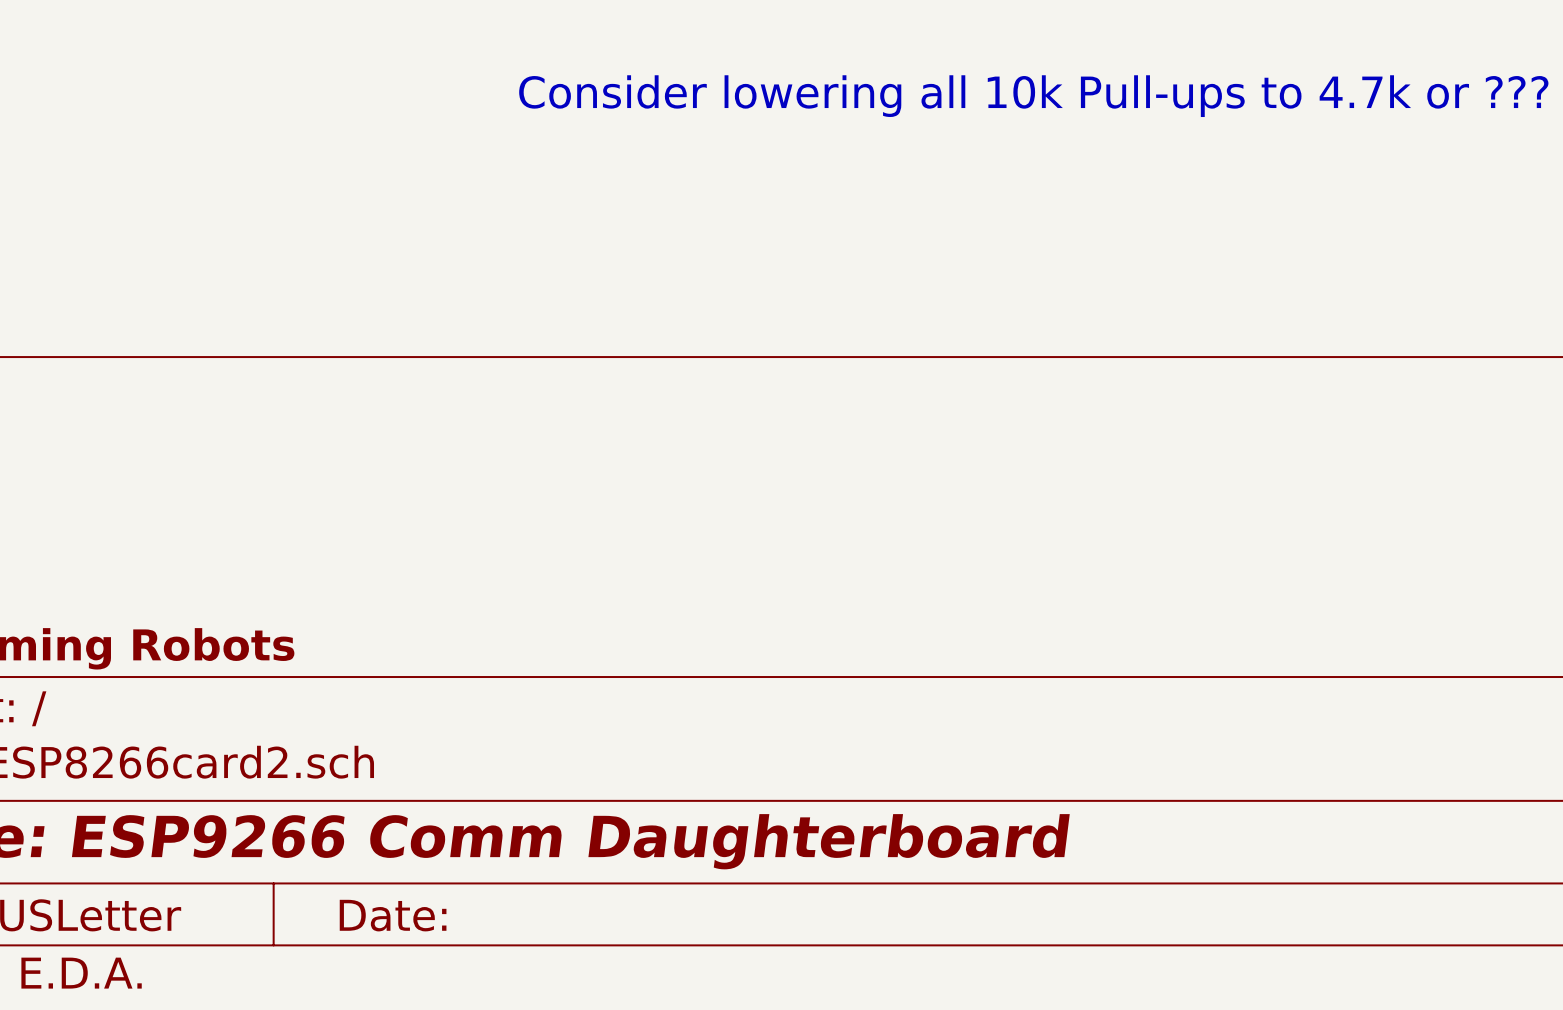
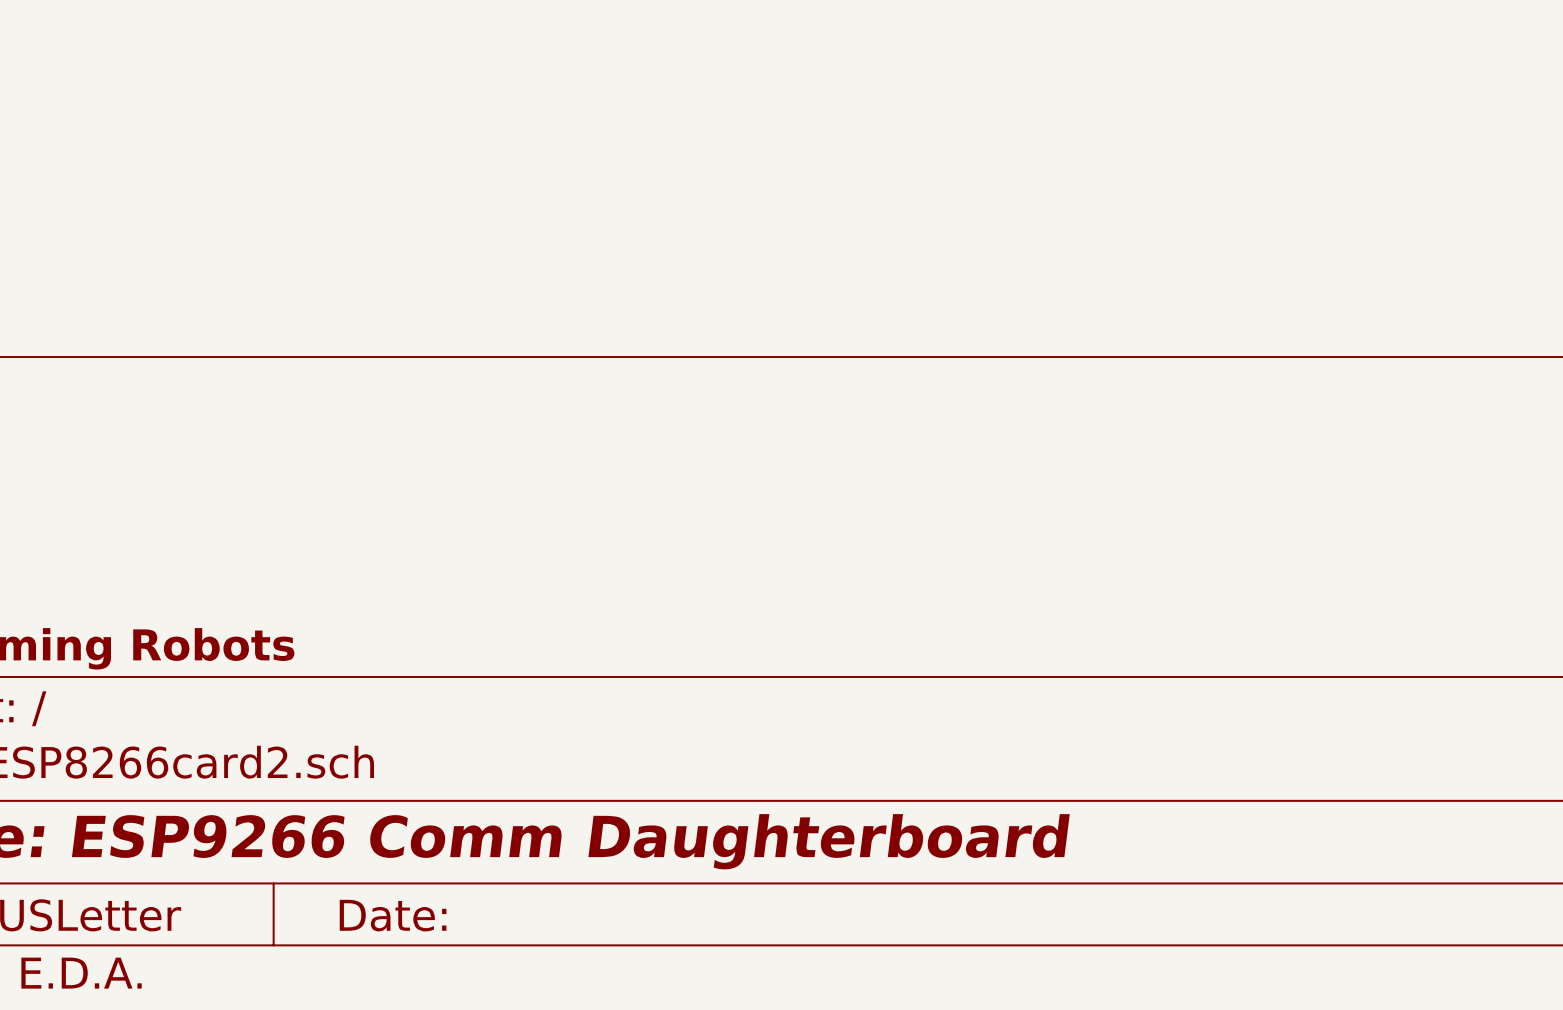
text: Consider lowering all 10k Pull-ups to 4.7k or ??? (1033, 96) -> none

